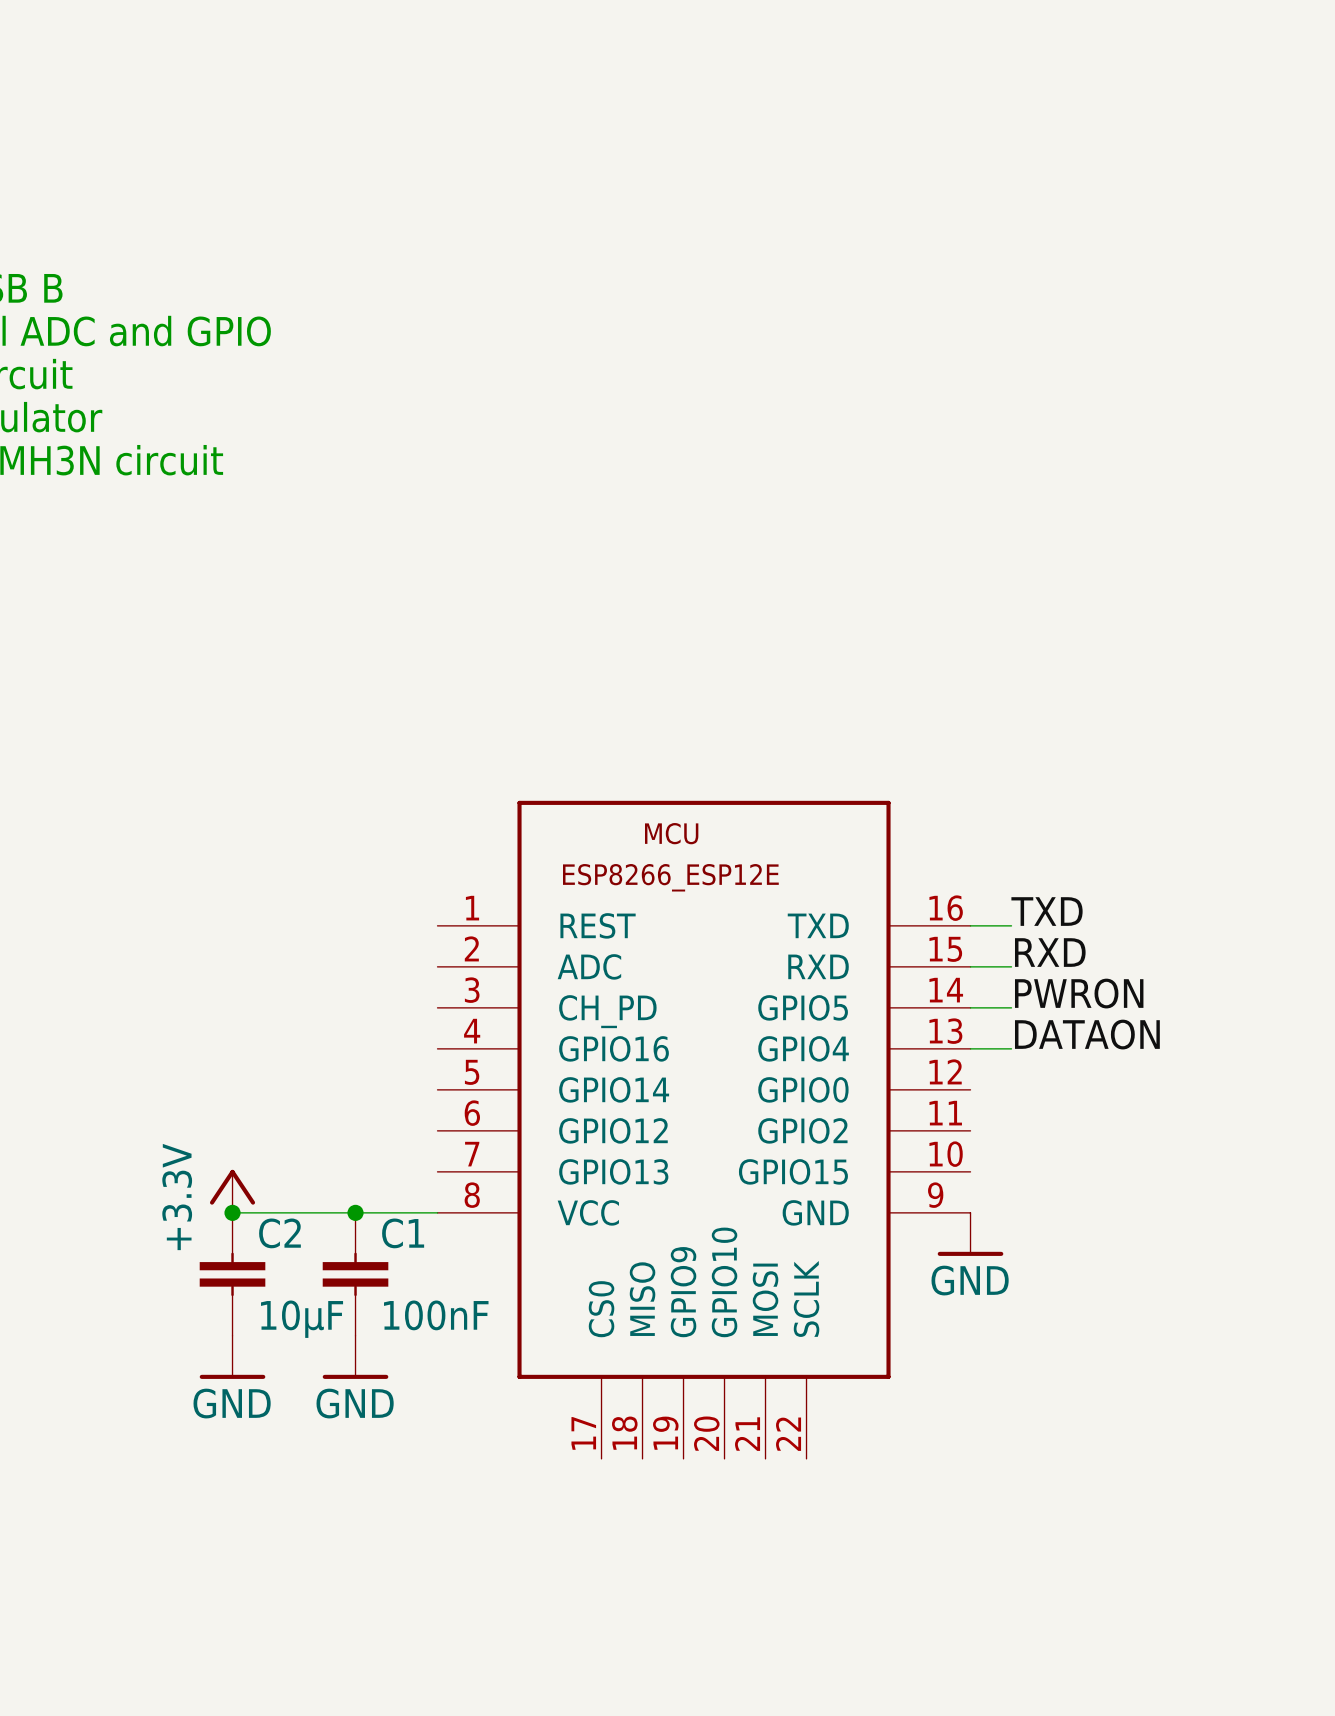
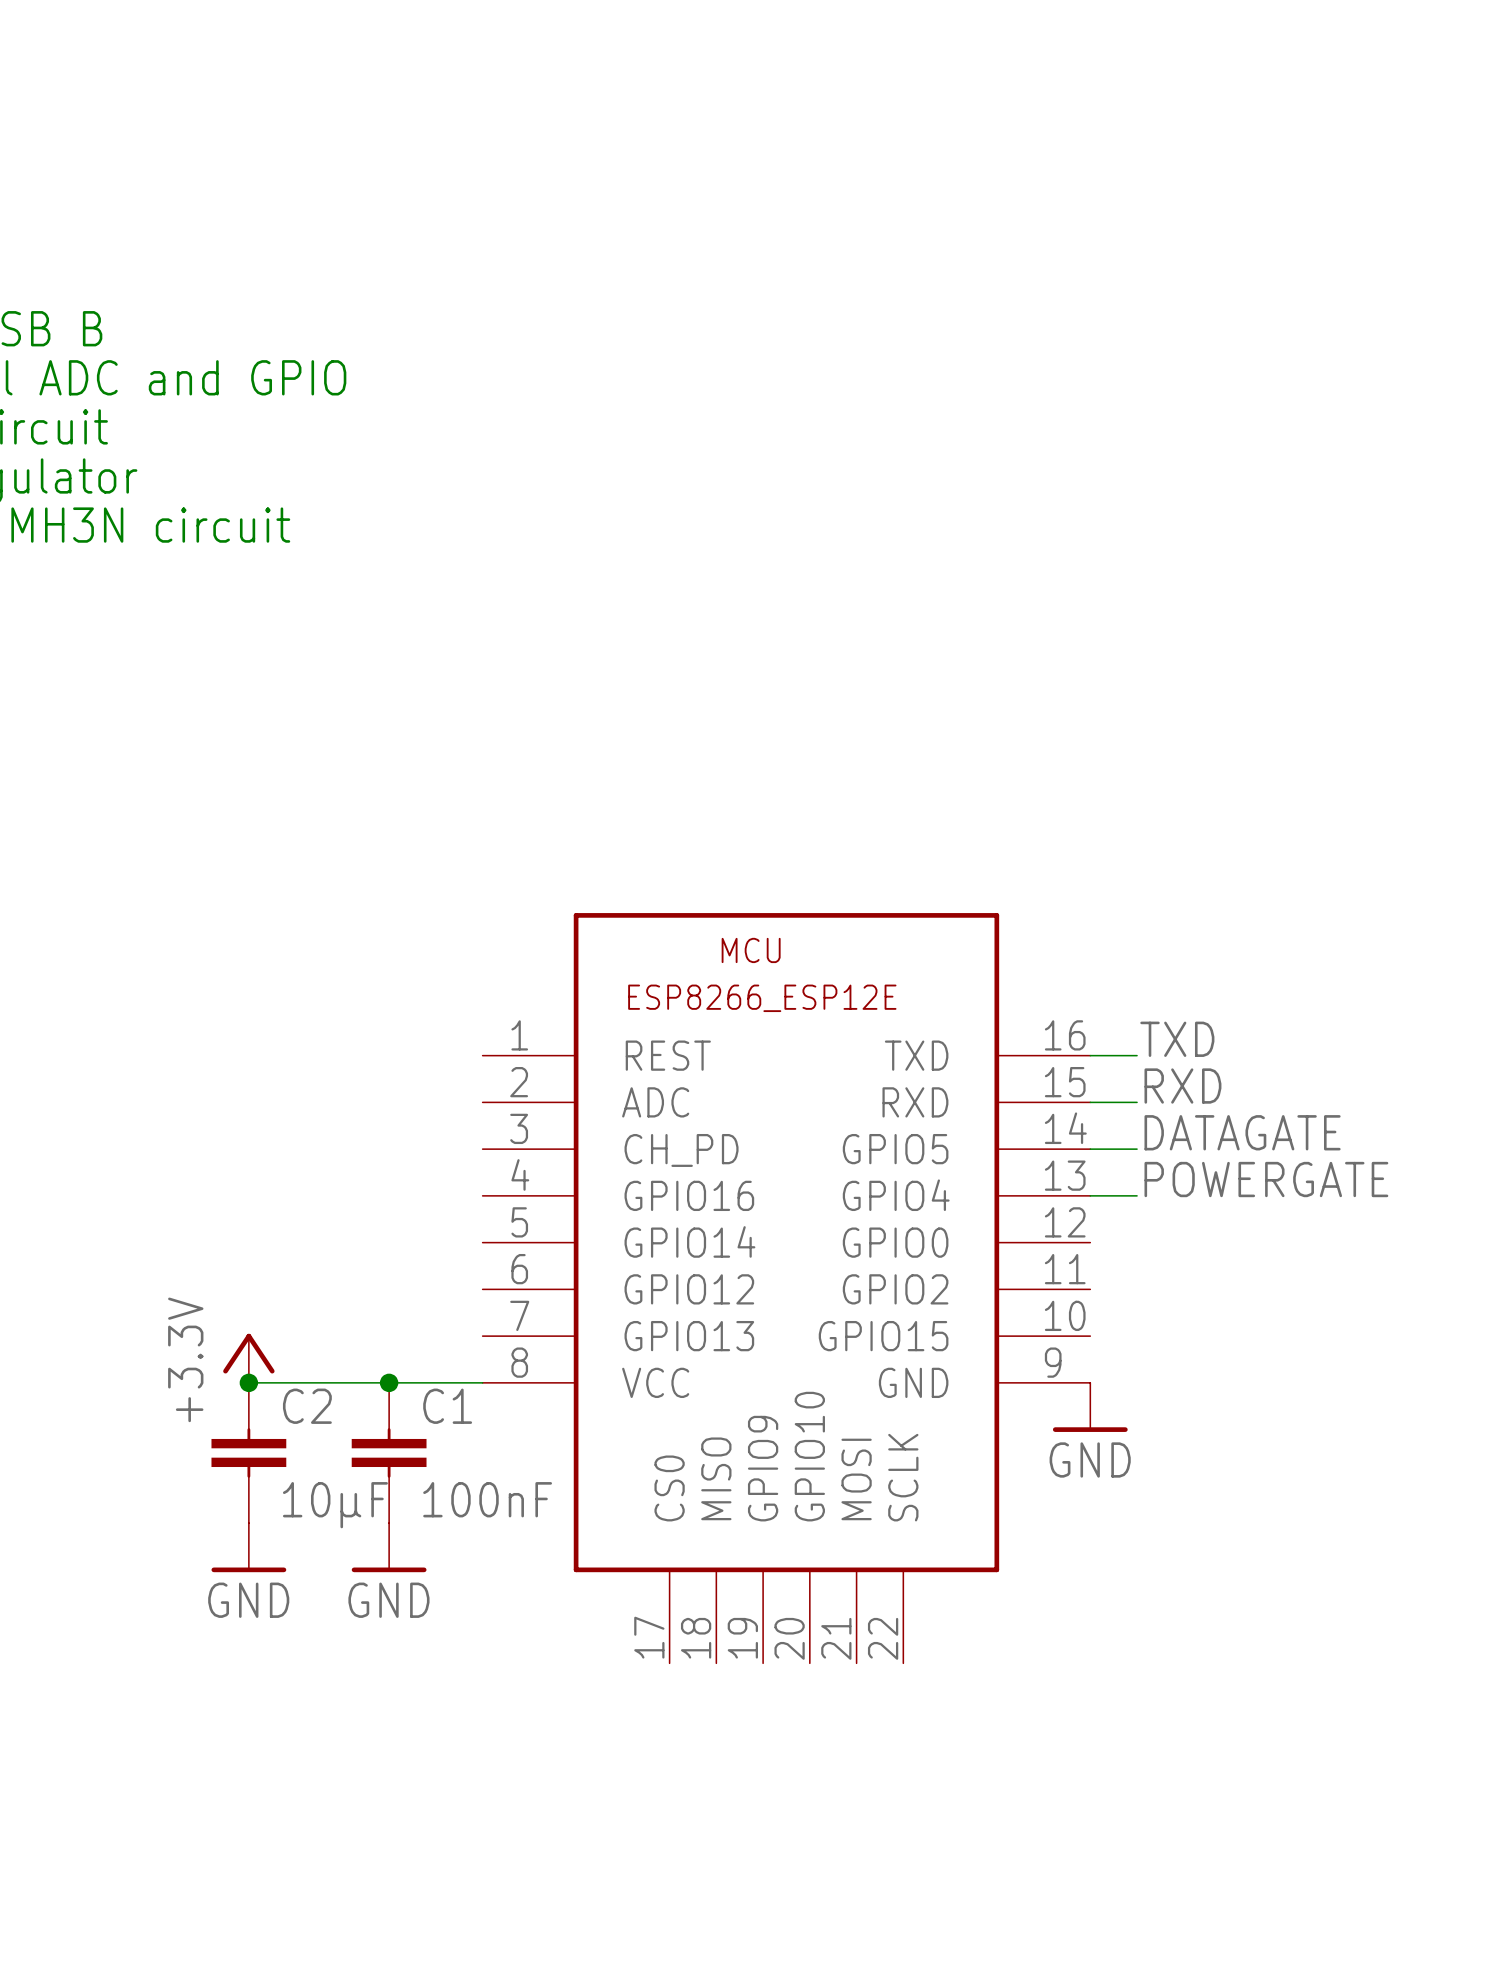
label: PWRON (1079, 993) -> DATAGATE (1242, 1132)
label: DATAON (1087, 1034) -> POWERGATE (1266, 1179)

